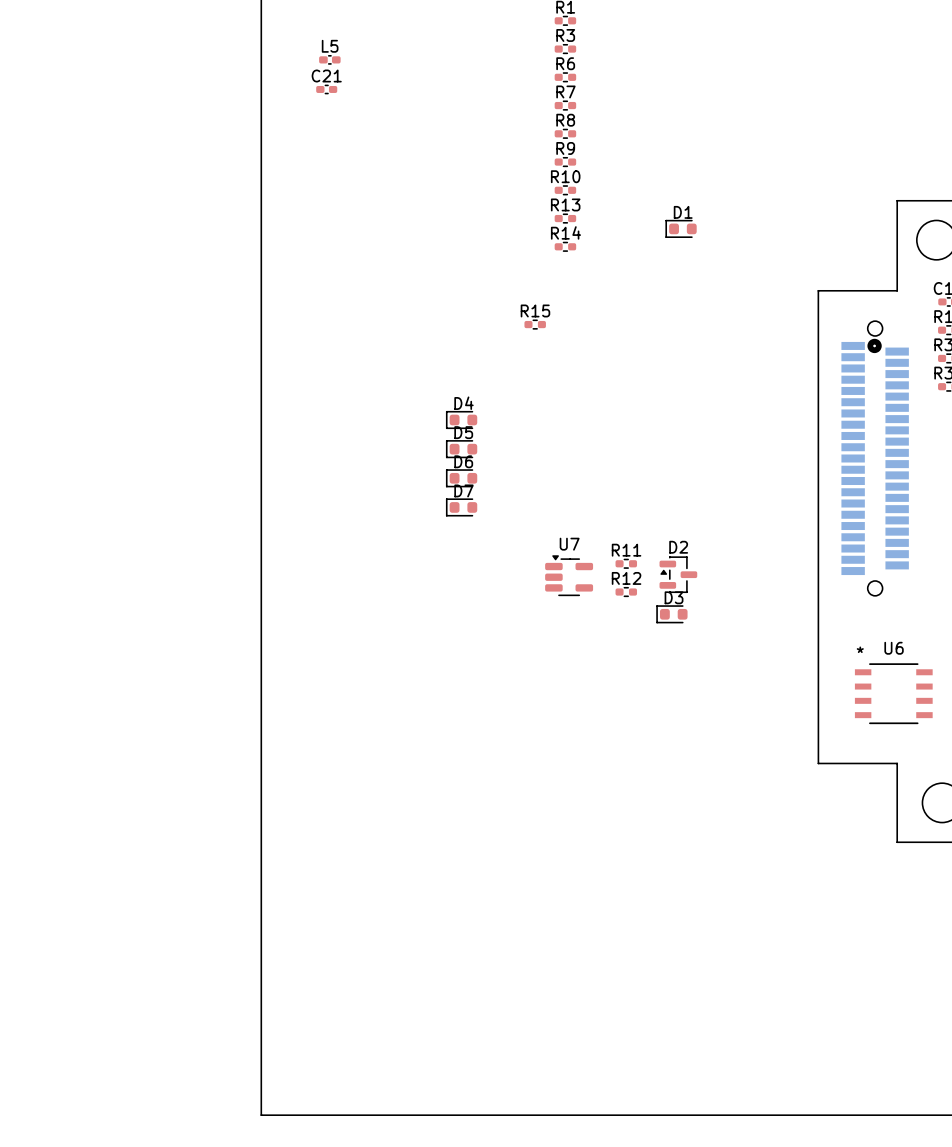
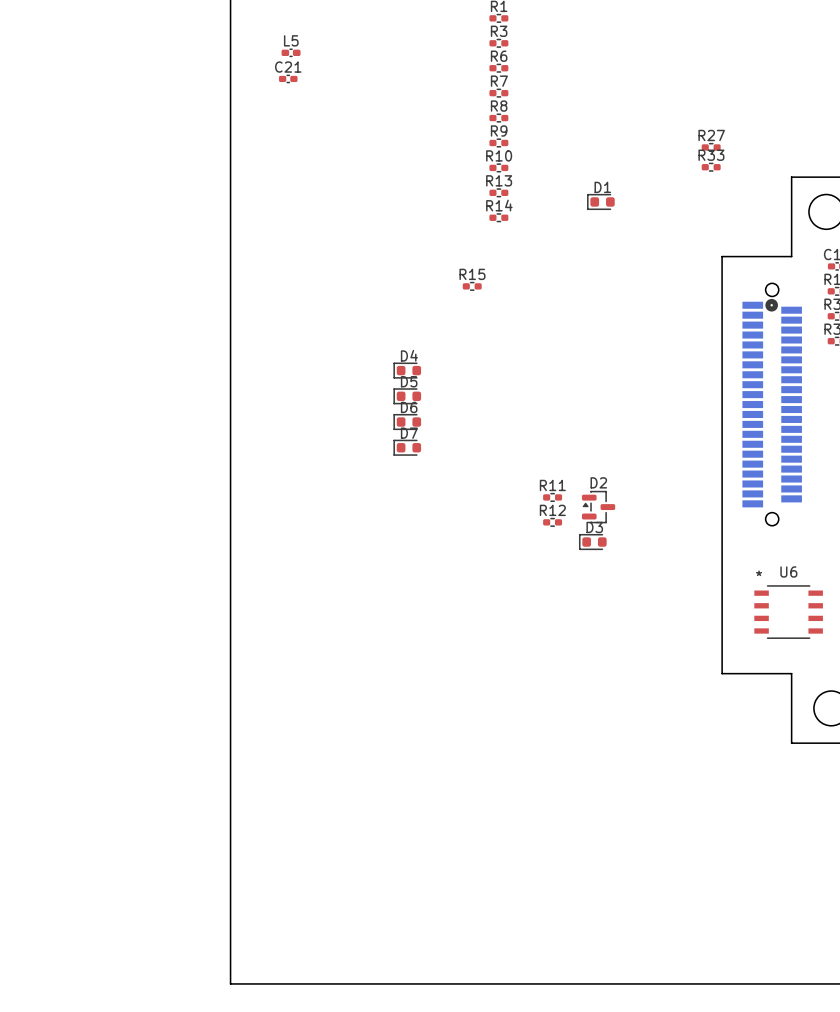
R27: none -> (711, 147)
R33: none -> (711, 167)
U7: (569, 575) -> none

